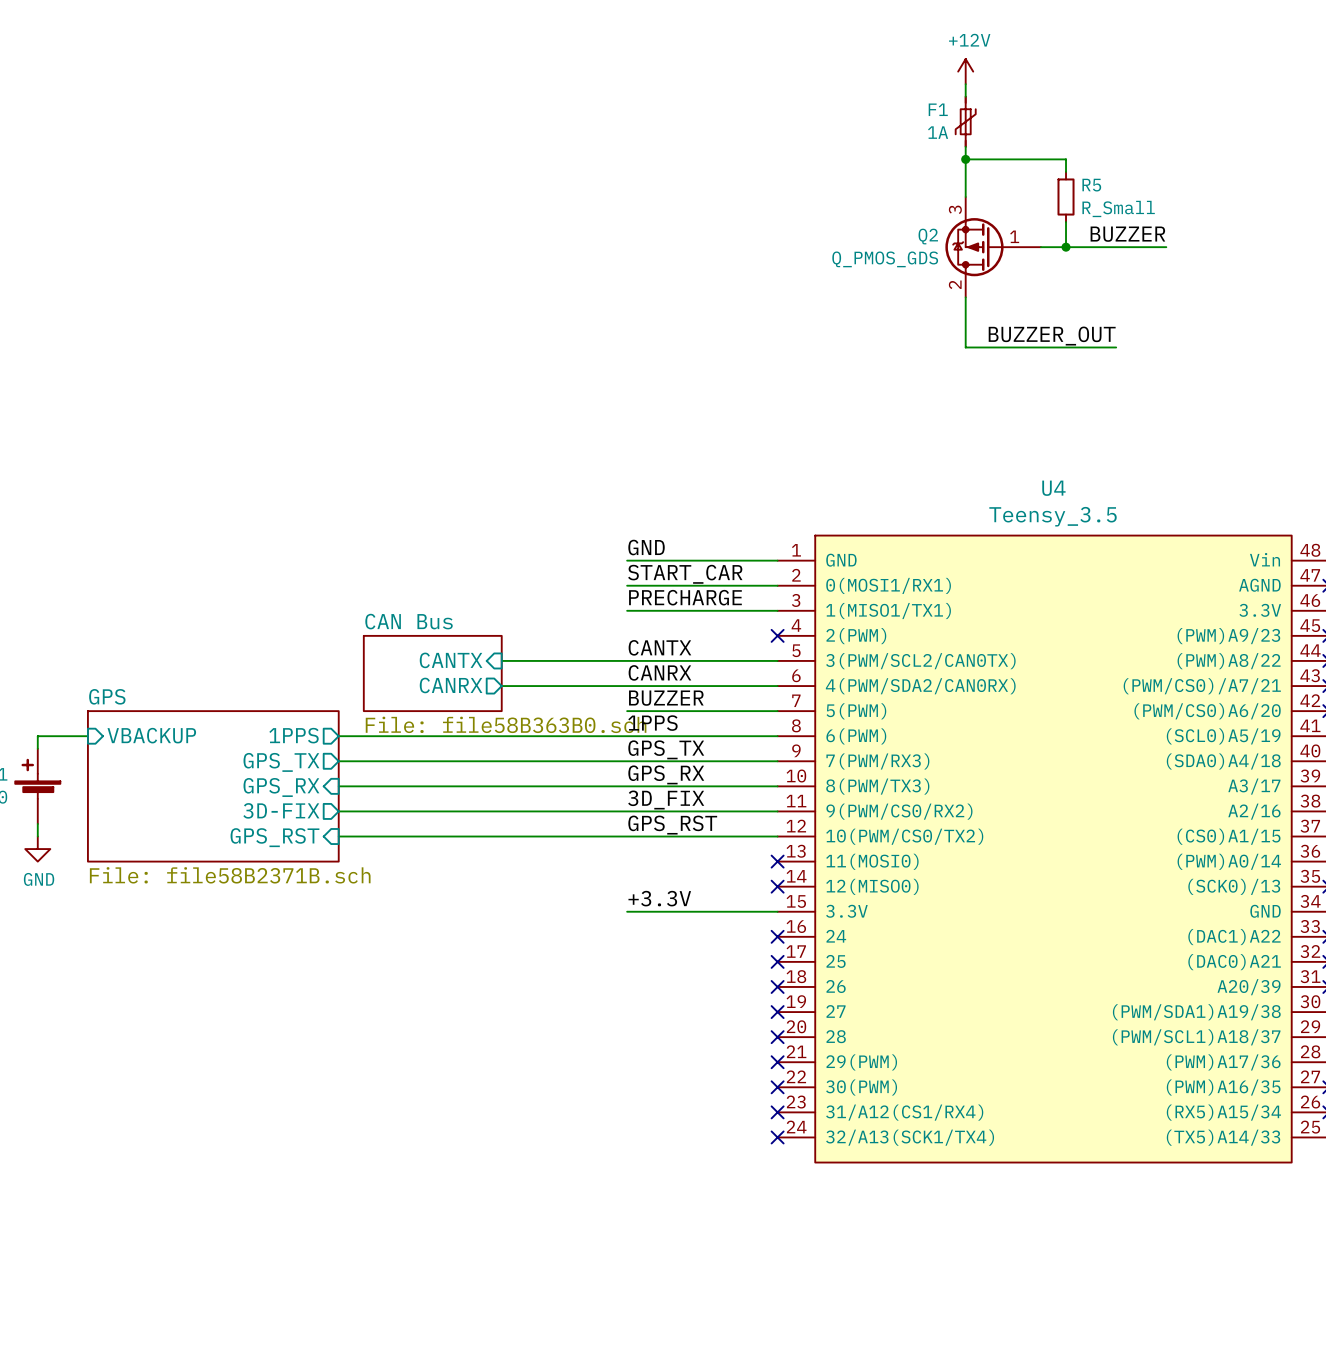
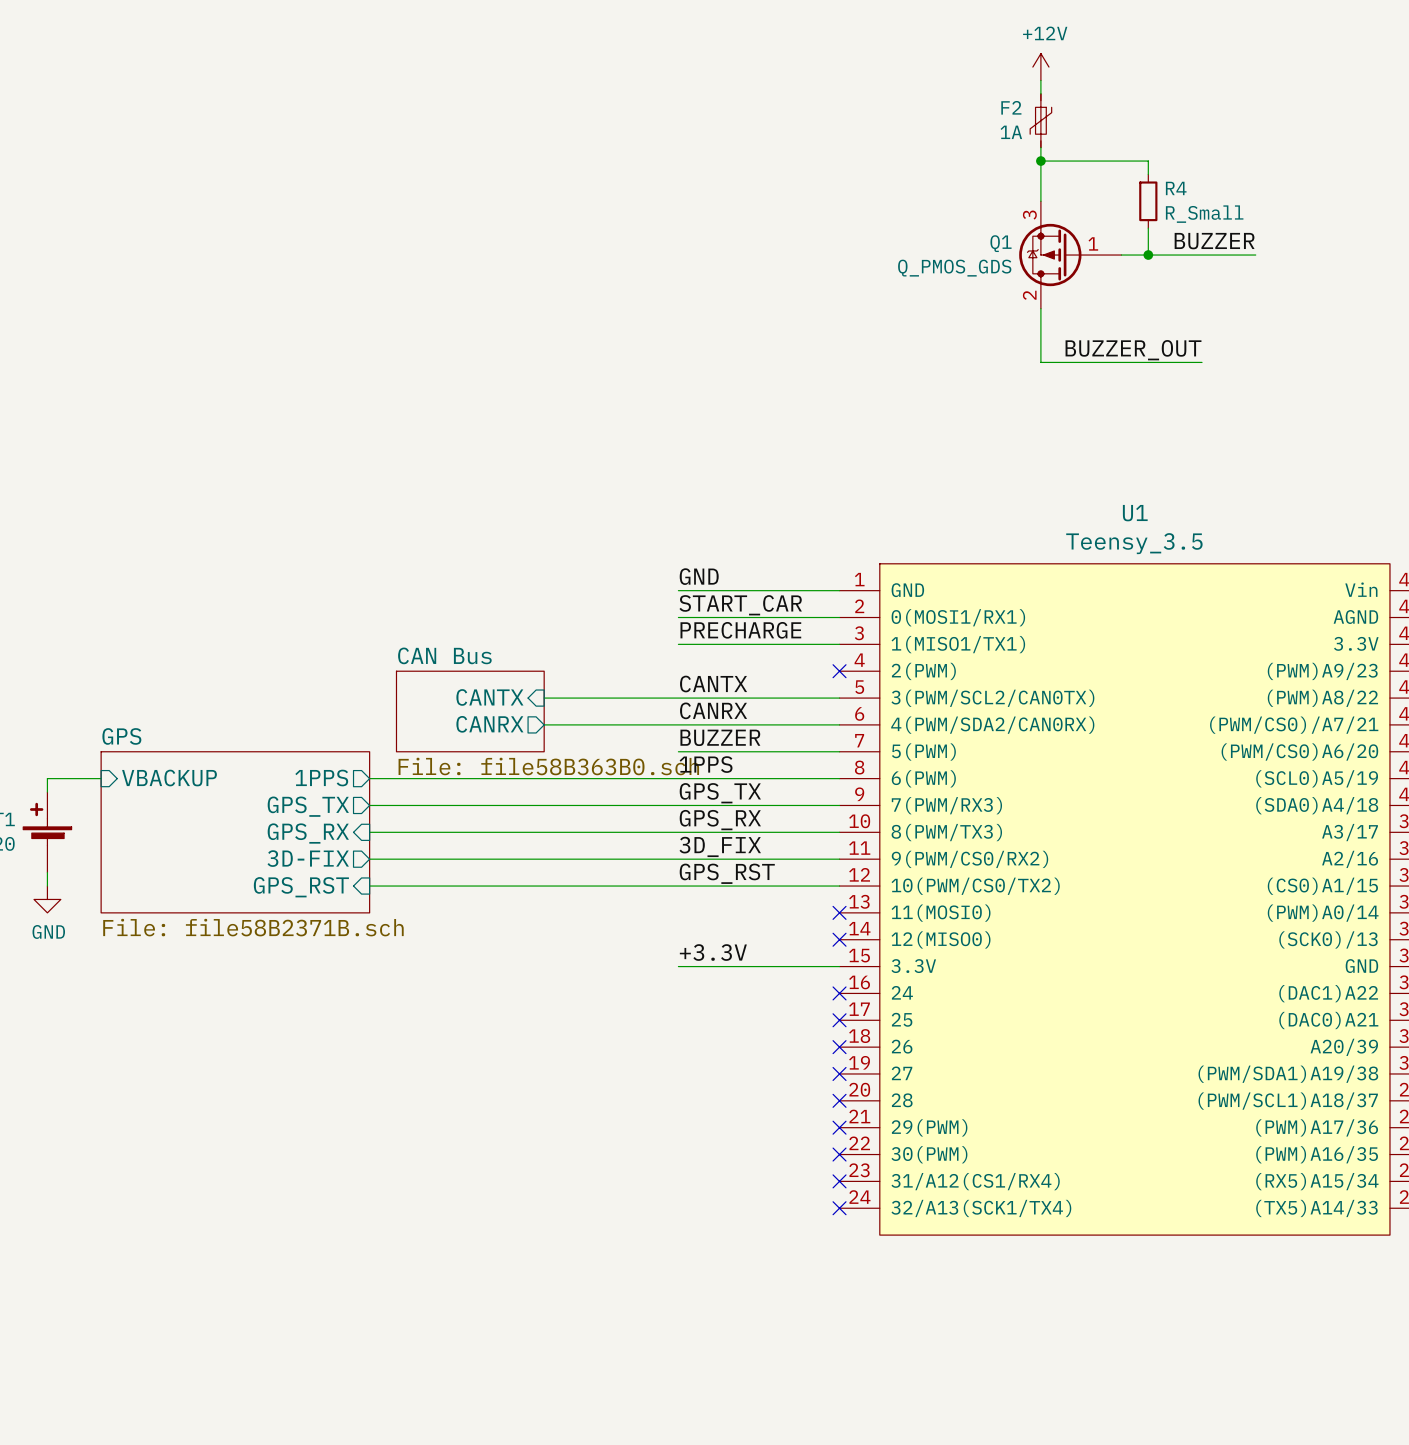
F1 name: F1 (938, 109) -> F2 (1011, 107)
R5 name: R5 (1091, 185) -> R4 (1176, 188)
Q2 name: Q2 (928, 236) -> Q1 (1001, 243)
U4 name: U4 (1053, 488) -> U1 (1135, 513)

